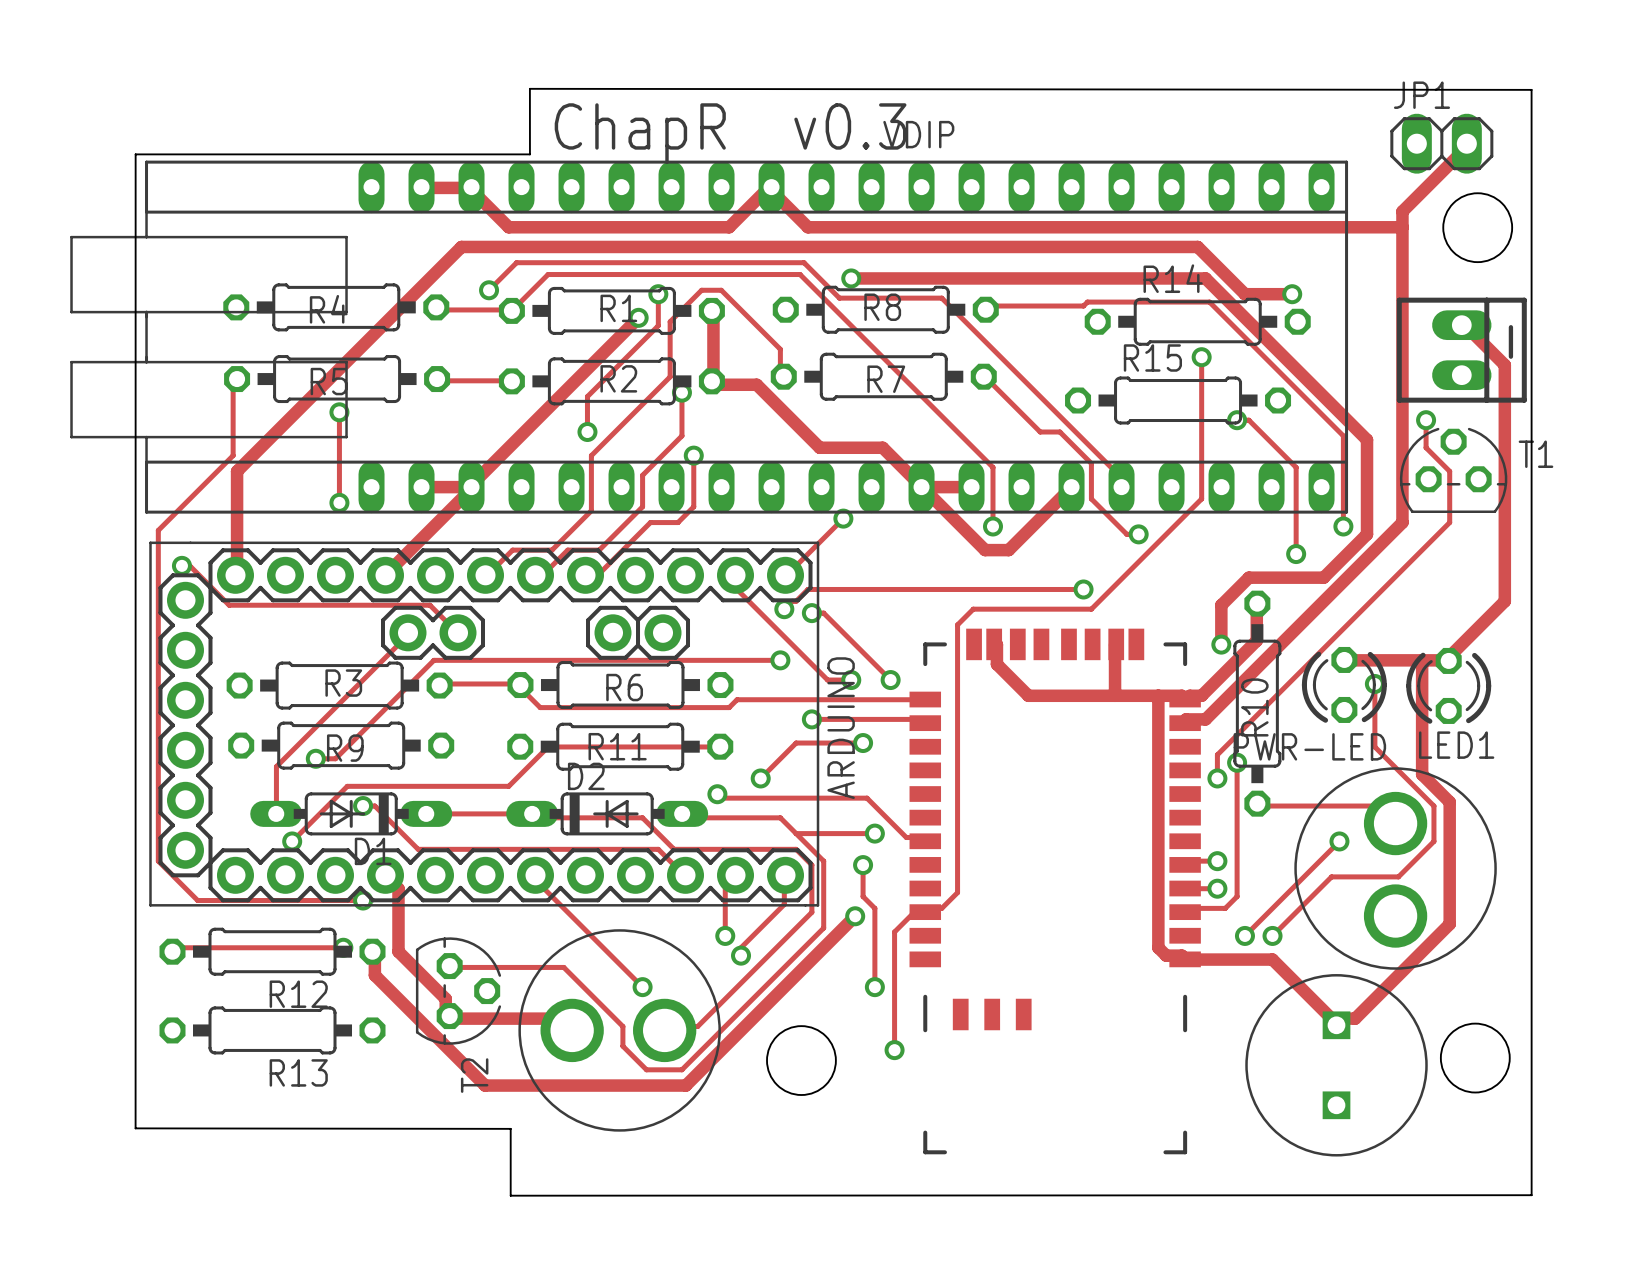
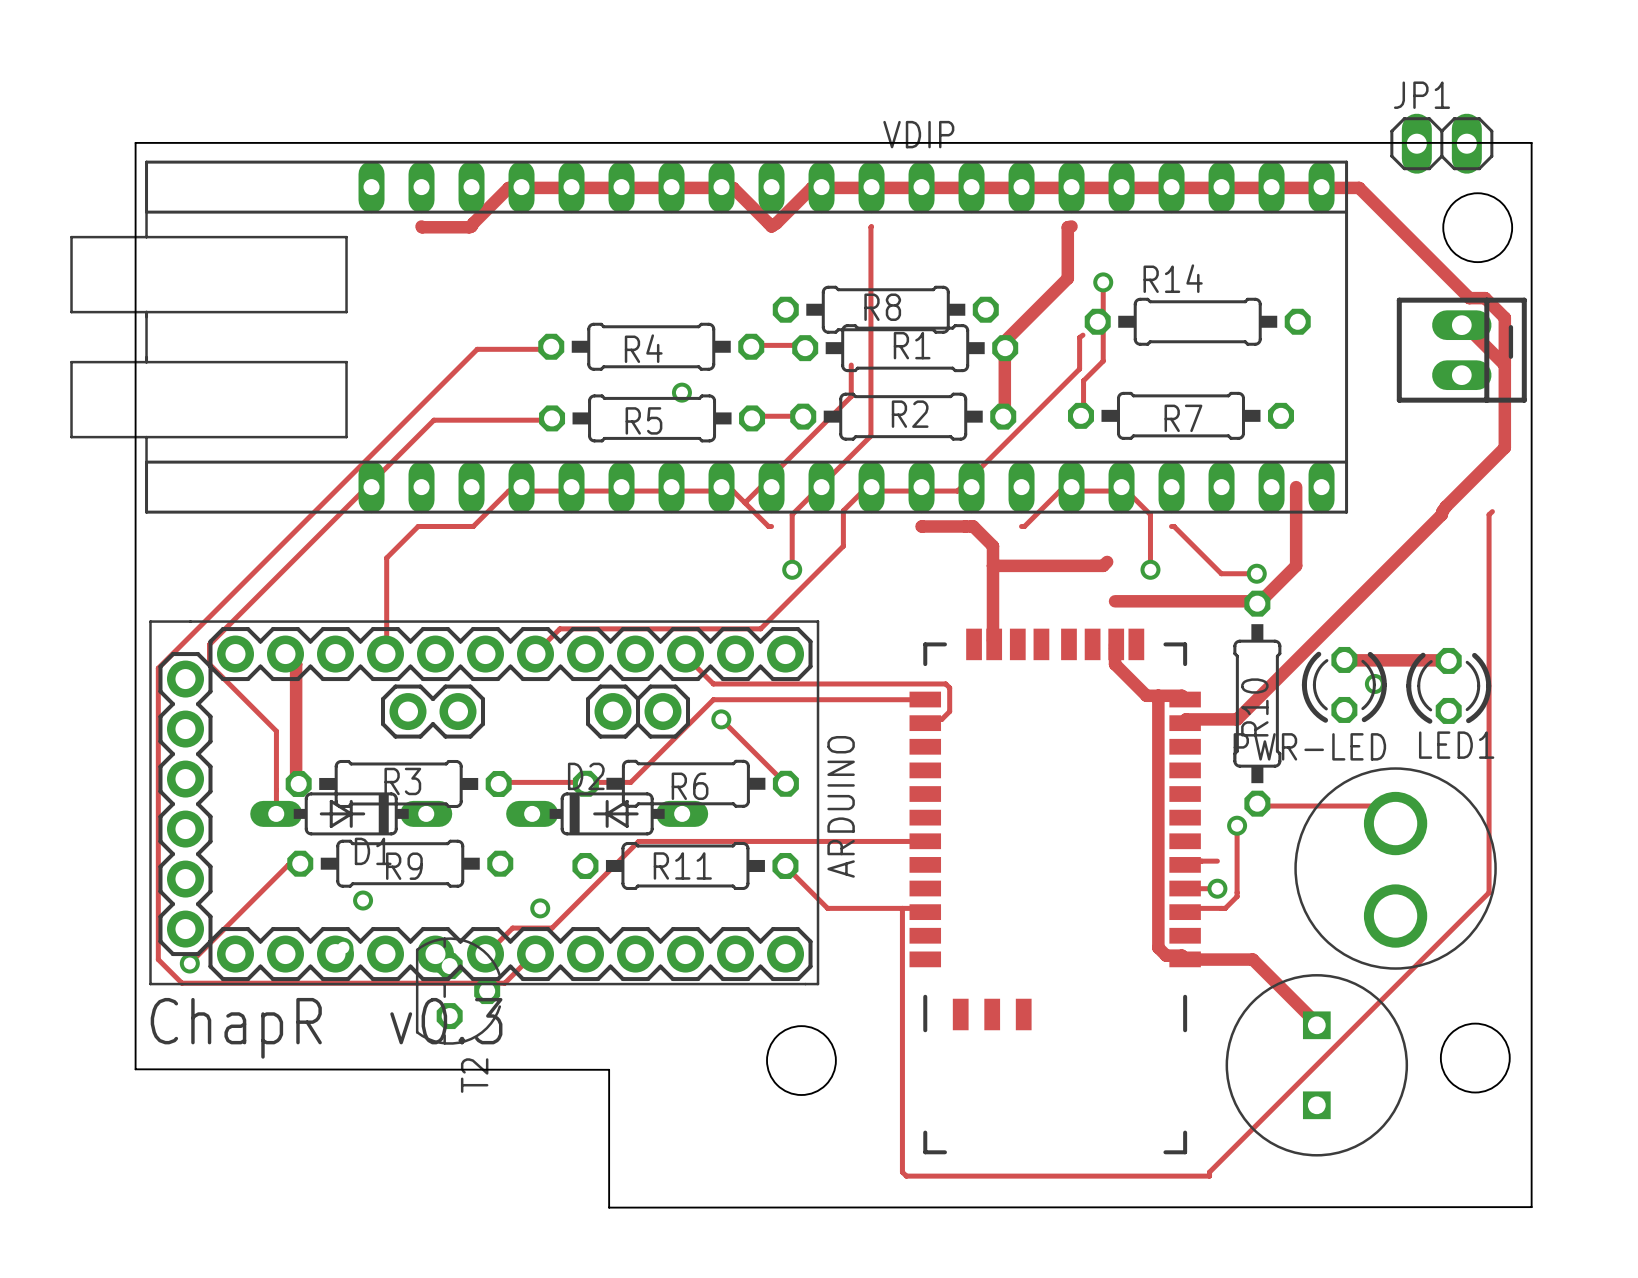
text: ChapR v0.3 (730, 133) -> none
board edge: (1531, 142) (1531, 89) (529, 88) (529, 154) (135, 154) (135, 1128) (510, 1128) (510, 1195) (1531, 1195) -> (1531, 142) (135, 142) (135, 1069) (609, 1069) (609, 1207) (1531, 1207) (1531, 1195)
track: (1466, 143) (1469, 144) (1402, 211) (1402, 522) (1205, 719) -> none
track: (421, 187) (471, 187) (473, 191) (508, 227) (729, 227) (771, 187) (772, 191) (807, 227) (1402, 227) -> none
track: none -> (421, 226) (471, 226) (508, 187) (733, 187) (771, 226) (811, 187) (1359, 187) (1469, 298) (1485, 298) (1504, 317) (1504, 365)
track: none -> (871, 226) (870, 435) (792, 514) (792, 569)
track: none -> (1071, 226) (1067, 227) (1067, 278) (1004, 341) (1004, 416) (1003, 416)
track: (851, 278) (1205, 278) (1367, 439) (1367, 534) (1323, 577) (1248, 577) (1221, 605) (1221, 644) -> none
via: (851, 278) -> none
track: none -> (1103, 282) (1103, 361) (1083, 380) (1083, 412) (1080, 415)
via: none -> (1103, 282)
track: (489, 290) (516, 262) (804, 262) (839, 298) (941, 298) (1118, 475) (1118, 483) (1121, 487) -> none
via: (489, 290) -> none
track: (658, 294) (658, 325) (587, 396) (587, 432) -> none
via: (658, 294) -> none
track: (1292, 294) (1244, 294) (1197, 246) (461, 246) (237, 471) (237, 573) (235, 575) -> none
via: (1292, 294) -> none
R4 position: (336, 307) -> (651, 346)
track: (436, 307) (437, 309) (511, 310) (548, 274) (800, 274) (992, 467) (992, 526) -> none
track: (985, 309) (989, 306) (1083, 306) (1087, 302) (1209, 302) (1343, 435) (1343, 526) -> none
R1 position: (611, 310) -> (905, 348)
track: (711, 310) (713, 313) (713, 380) (711, 381) (717, 384) (756, 384) (819, 447) (882, 447) (921, 487) -> none
track: (638, 317) (473, 483) (471, 487) -> none
via: (638, 317) -> none
track: none -> (1082, 335) (1079, 337) (1079, 369) (957, 491) (863, 491) (843, 510) (843, 546) (760, 628) (559, 628) (535, 654)
track: none -> (751, 346) (804, 345) (805, 348)
track: (1201, 357) (1201, 498) (1091, 609) (973, 609) (957, 624) (957, 892) (941, 908) (926, 908) (925, 912) (914, 912) (894, 932) (894, 1050) -> none
via: (1201, 357) -> none
track: none -> (851, 365) (851, 396) (744, 502)
track: (783, 376) (780, 372) (780, 349) (721, 290) (701, 290) (670, 321) (670, 376) (591, 455) (591, 510) (552, 550) (512, 550) (485, 575) -> none
R7 position: (883, 376) -> (1180, 415)
track: (983, 376) (1040, 432) (1059, 432) (1091, 463) (1091, 498) (1126, 534) (1138, 534) -> none
track: (237, 379) (233, 380) (233, 455) (158, 530) (158, 668) -> (551, 346) (548, 349) (477, 349) (158, 668)
R5 position: (337, 379) -> (652, 418)
track: (437, 379) (437, 380) (511, 381) -> none
R2 position: (611, 381) -> (903, 416)
track: (681, 392) (681, 435) (642, 475) (642, 506) (599, 550) (567, 550) (544, 573) (535, 575) -> none
R15: (1178, 400) -> none
track: (339, 412) (339, 502) -> none
via: (339, 412) -> none
track: none -> (803, 416) (752, 416) (752, 418)
track: (1237, 420) (1248, 420) (1296, 467) (1296, 487) -> none
via: (1237, 420) -> none
track: (1426, 420) (1426, 447) (1449, 471) (1449, 522) (1217, 754) (1217, 778) -> none
via: (1426, 420) -> none
via: (587, 432) -> none
track: (1504, 447) (1504, 601) (1449, 656) (1448, 660) -> (1504, 447) (1445, 506) (1441, 514) (1237, 719) (1205, 719)
track: (693, 455) (693, 506) (678, 522) (650, 522) (599, 573) (585, 575) -> none
via: (693, 455) -> none
T1: (1453, 470) -> none
track: (421, 487) (471, 487) -> none
track: (471, 487) (385, 575) -> none
track: (921, 487) (971, 487) -> none
track: (921, 487) (985, 550) (1008, 550) (1071, 487) -> none
track width: thin (1296, 487) (1296, 554) -> thick (1296, 487) (1296, 554)
via: (339, 502) -> none
track: none -> (1492, 511) (1489, 514) (1489, 892) (1209, 1172) (1209, 1176) (906, 1176) (902, 1172) (902, 908)
track: (843, 518) (785, 575) -> none
via: (843, 518) -> none
track: none -> (771, 526) (768, 526) (733, 491) (508, 491) (473, 526) (418, 526) (386, 557) (385, 654)
via: (992, 526) -> none
track: none -> (1021, 526) (1024, 526) (1059, 491) (1126, 491) (1150, 514) (1150, 569)
track: none -> (1171, 526) (1174, 526) (1221, 573) (1256, 573)
via: (1343, 526) -> none
via: (1138, 534) -> none
track: none -> (1296, 554) (1296, 565) (1257, 603) (1256, 601) (1115, 601)
via: (1296, 554) -> none
track: none -> (1107, 561) (1103, 565) (992, 565)
track: (181, 565) (189, 565) (229, 605) (429, 605) (458, 632) -> none
via: (181, 565) -> none
via: none -> (792, 569)
via: none -> (1150, 569)
via: none -> (1256, 573)
track: (735, 575) (737, 589) (827, 680) (851, 680) -> none
track: (1083, 589) (807, 589) (796, 601) (792, 601) (784, 609) -> none
via: (1083, 589) -> none
track: (1257, 603) (1256, 640) (1201, 695) (1189, 695) (1185, 699) -> none
via: (784, 609) -> none
track: (811, 613) (823, 613) (890, 680) -> none
via: (811, 613) -> none
track: (408, 632) (406, 636) (276, 766) -> (552, 418) (552, 420) (433, 420) (209, 644) (209, 664) (276, 731) (276, 766)
track: (994, 644) (996, 644) (996, 664) (1028, 695) (1146, 695) -> (994, 644) (992, 546) (973, 526) (921, 526)
via: (1221, 644) -> none
track: none -> (285, 654) (296, 664) (296, 782) (298, 783)
track: (780, 660) (433, 660) (335, 758) (315, 758) -> none
via: (780, 660) -> none
track: (1422, 660) (1422, 774) (1449, 802) (1449, 924) (1355, 1018) (1339, 1018) (1336, 1025) (1272, 959) (1252, 959) -> (1316, 1025) (1252, 959)
track: (1115, 664) (1115, 695) -> (1115, 664) (1146, 695)
via: (851, 680) -> none
via: (890, 680) -> none
track: (1374, 683) (1374, 746) (1433, 806) (1433, 841) (1398, 876) (1331, 876) (1272, 935) -> none
R3 position: (339, 685) -> (398, 783)
track: (439, 685) (441, 683) (516, 683) (520, 685) (520, 687) (540, 707) (729, 707) (737, 699) -> (498, 783) (500, 782) (630, 782) (713, 699) (737, 699)
R6 position: (620, 685) -> (685, 783)
track: none -> (721, 719) (785, 783)
via: none -> (721, 719)
track: (811, 719) (922, 719) (925, 723) -> (685, 654) (713, 683) (945, 683) (949, 687) (949, 711) (941, 719) (926, 719) (925, 723)
via: (811, 719) -> none
ARDUINO position: (484, 724) -> (484, 802)
track: (863, 743) (796, 743) (760, 778) -> none
via: (863, 743) -> none
R9 position: (341, 745) -> (400, 863)
R11 position: (620, 746) -> (685, 865)
track: (720, 746) (548, 746) (508, 786) (347, 786) (292, 841) -> none
via: (315, 758) -> none
track: (1237, 762) (1237, 825) -> none
via: (1237, 762) -> none
via: (760, 778) -> none
via: (1217, 778) -> none
track: (717, 794) (721, 798) (867, 798) (906, 837) (922, 837) (925, 841) -> (485, 954) (512, 928) (552, 928) (638, 841) (925, 841)
via: (717, 794) -> none
track: (363, 806) (374, 806) (418, 849) (658, 849) (685, 875) -> none
via: (363, 806) -> none
track: (426, 813) (532, 813) (532, 817) (642, 817) (674, 849) (796, 849) (811, 865) (811, 912) (697, 1026) (666, 1026) (664, 1030) -> none
track: (682, 813) (685, 817) (780, 817) (823, 861) (823, 928) (681, 1069) (646, 1069) (622, 1046) (622, 1026) (563, 967) (449, 966) -> none
via: none -> (1237, 825)
track: (796, 833) (874, 833) -> none
via: (874, 833) -> none
via: (292, 841) -> none
track: (1339, 841) (1244, 935) -> none
via: (1339, 841) -> none
track: (158, 861) (197, 900) (363, 900) -> (158, 861) (158, 959) (181, 983) (504, 983) (535, 954)
via: (1217, 861) -> none
track: none -> (300, 863) (288, 865) (189, 963)
track: none -> (785, 865) (827, 908) (922, 908) (925, 912)
track: (863, 865) (863, 896) (874, 908) (874, 987) -> none
via: (863, 865) -> none
track: (385, 875) (398, 888) (398, 951) (445, 998) (445, 1010) (449, 1016) (453, 1018) (563, 1018) (571, 1026) (572, 1030) -> none
track: (535, 875) (532, 876) (642, 987) -> none
track: (735, 875) (725, 884) (725, 935) -> none
track: (785, 875) (784, 904) (741, 947) (741, 955) -> none
via: none -> (540, 908)
track: (855, 916) (685, 1085) (485, 1085) (374, 975) (374, 955) (372, 951) -> none
via: (855, 916) -> none
via: (725, 935) -> none
via: (1244, 935) -> none
via: (1272, 935) -> none
track: (343, 947) (174, 947) (172, 951) -> none
R12: (272, 951) -> none
via: (741, 955) -> none
via: none -> (189, 963)
via: (642, 987) -> none
via: (874, 987) -> none
text: none -> ChapR v0.3 (326, 1028)
R13: (272, 1030) -> none
part: (619, 1030) -> none
via: (894, 1050) -> none
part position: (1336, 1065) -> (1316, 1065)

